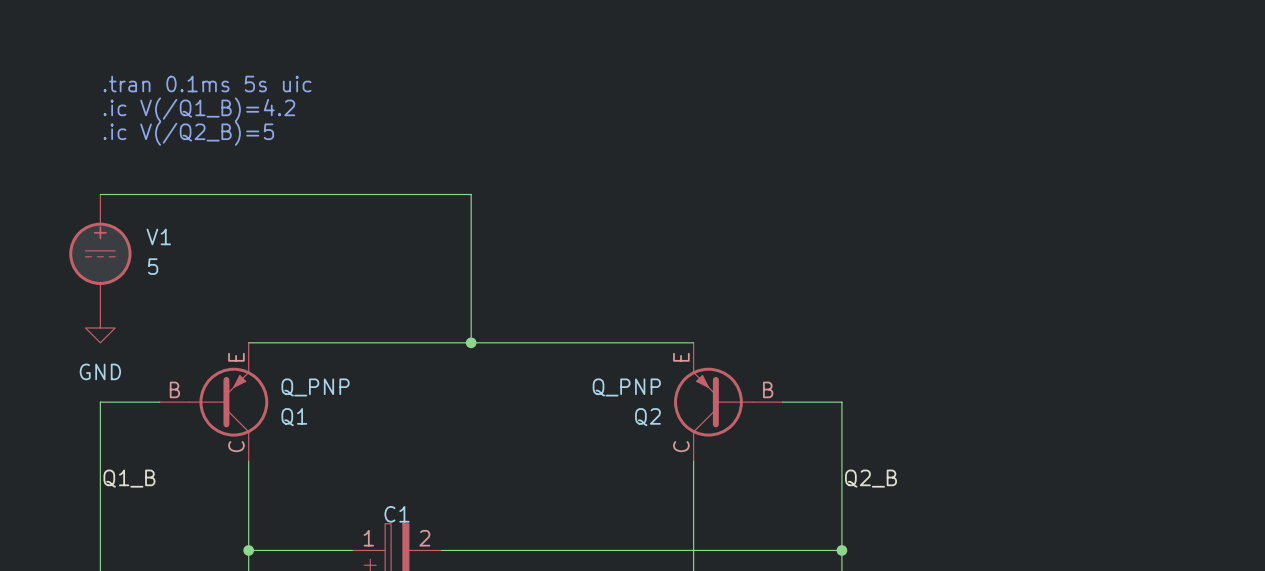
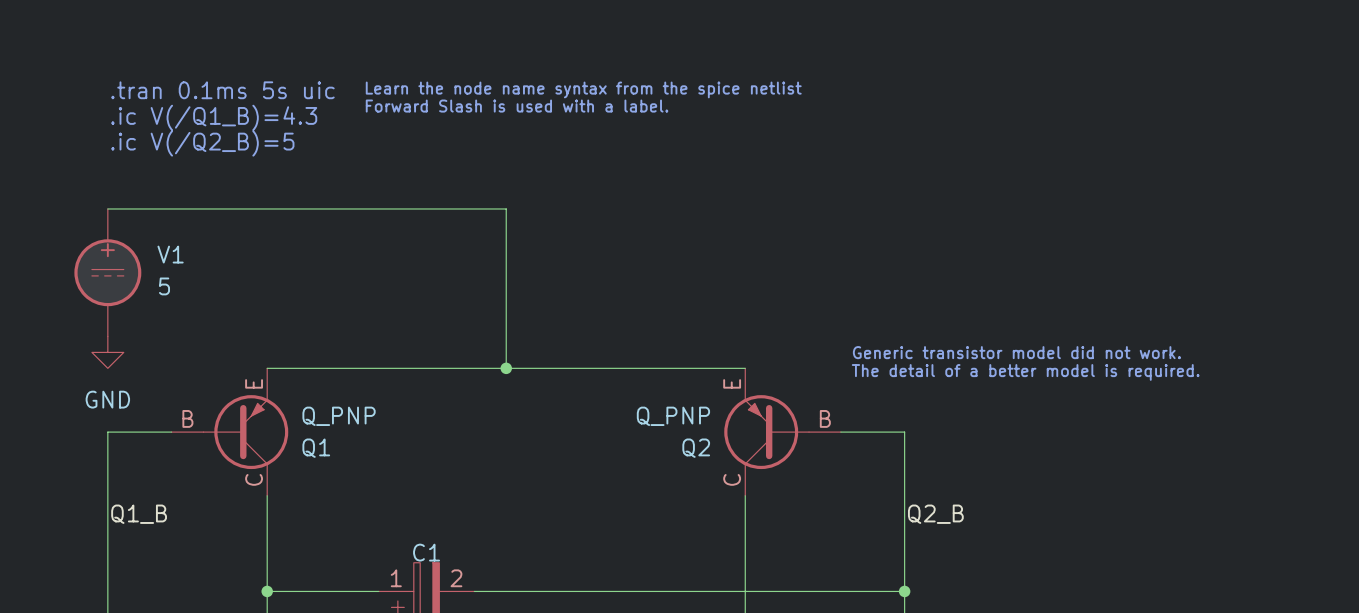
text: none -> Learn the node name syntax from the spice netlist (583, 89)
text: none -> Forward Slash is used with a label. (517, 106)
text: .ic V(/Q1_B)=4.2 (199, 109) -> .ic V(/Q1_B)=4.3 (214, 117)
text: none -> Generic transistor model did not work. (1016, 352)
text: none -> The detail of a better model is required. (1025, 372)

